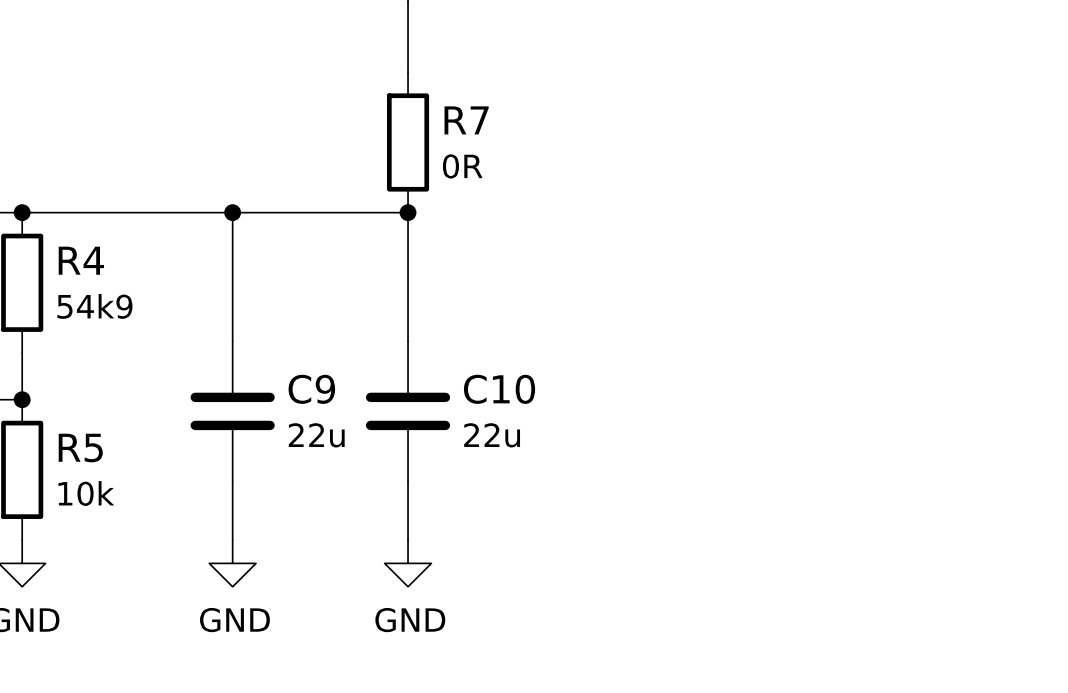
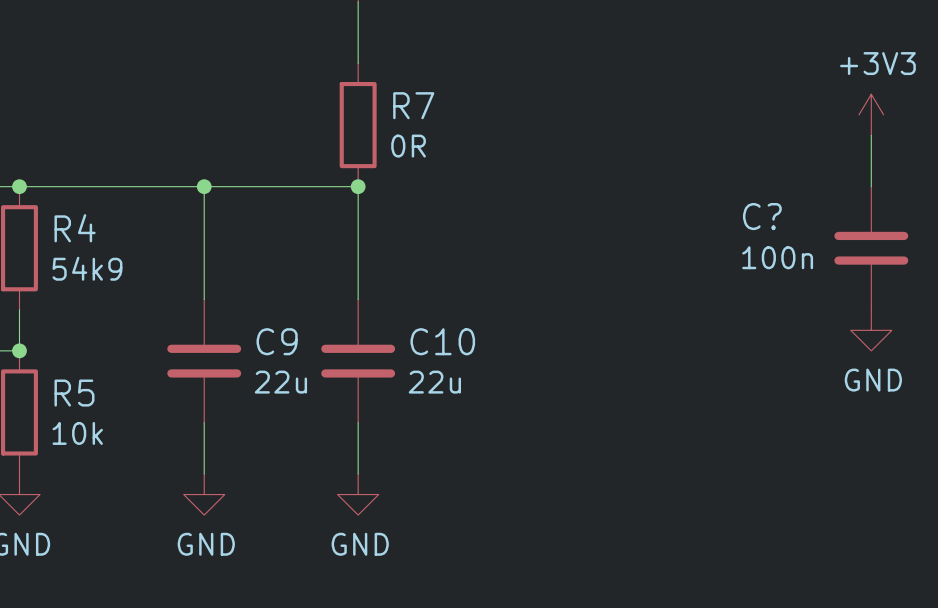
power symbol: none -> +3V3 (871, 114)
wire: none -> (871, 135) (871, 186)
C?: none -> (871, 248)
power symbol: none -> GND (871, 330)

